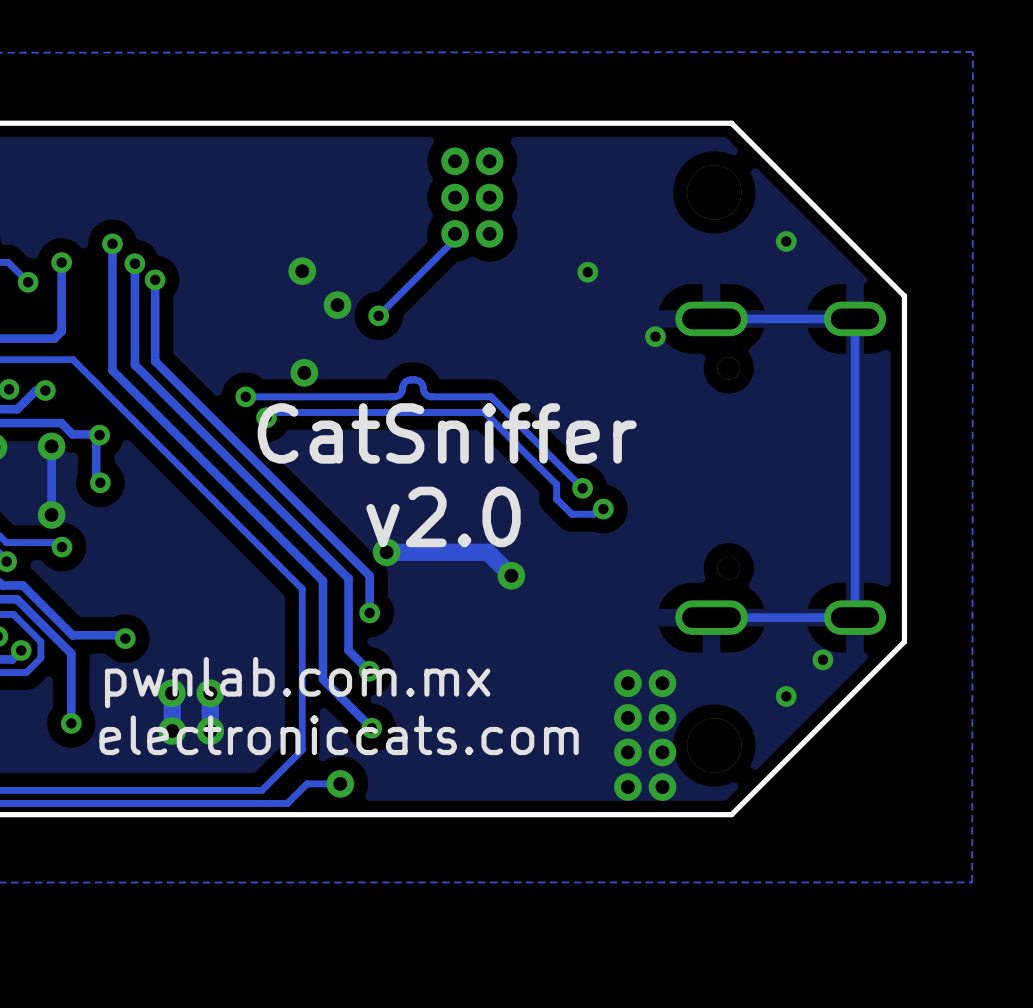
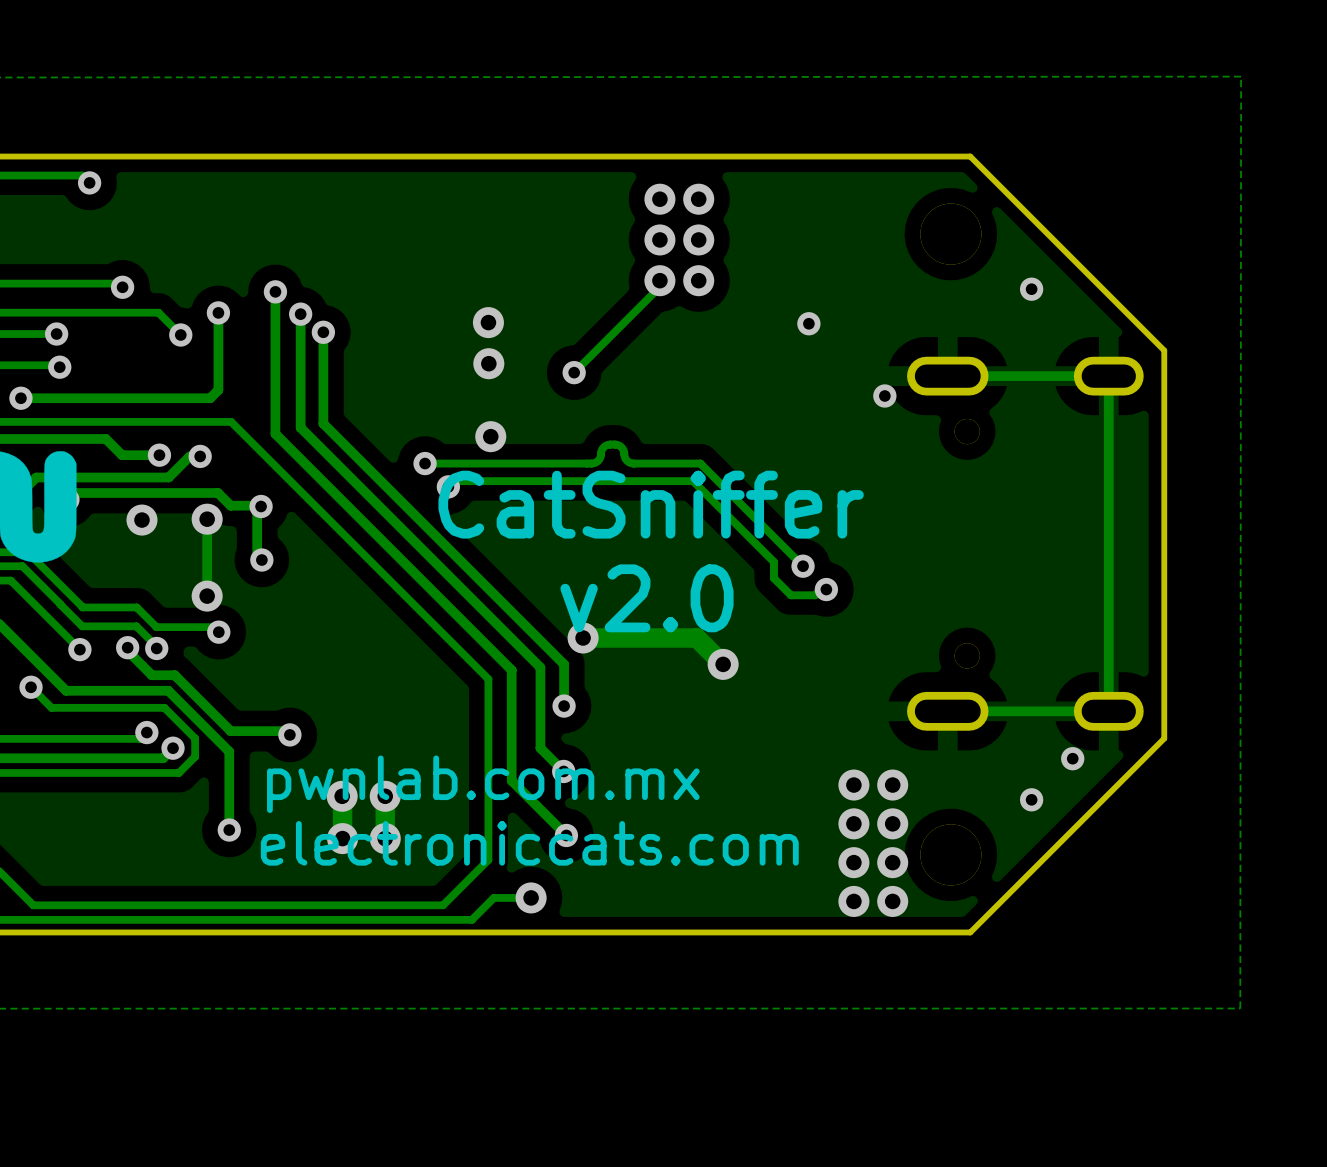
via position: (337, 305) -> (488, 363)

